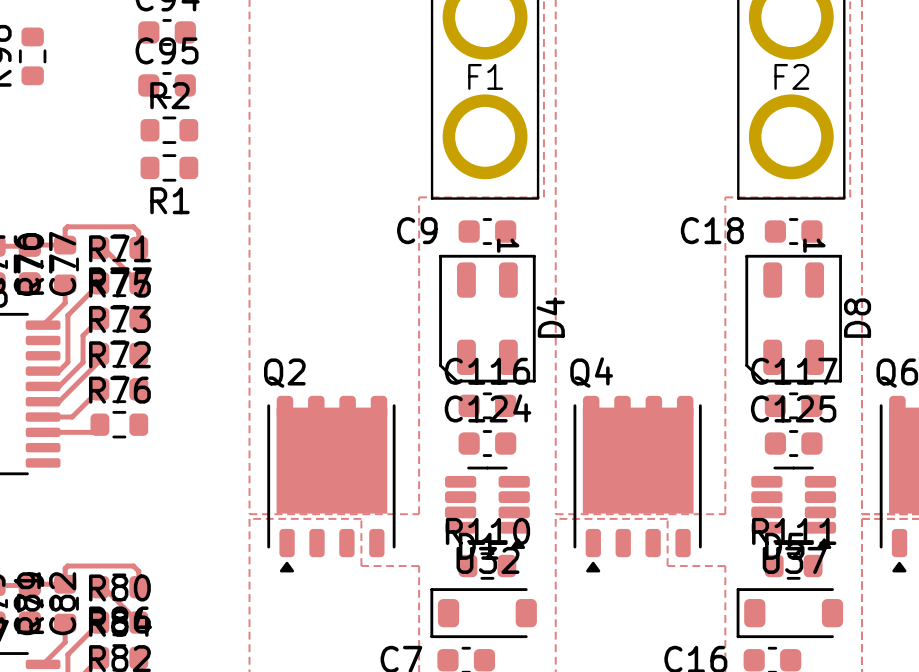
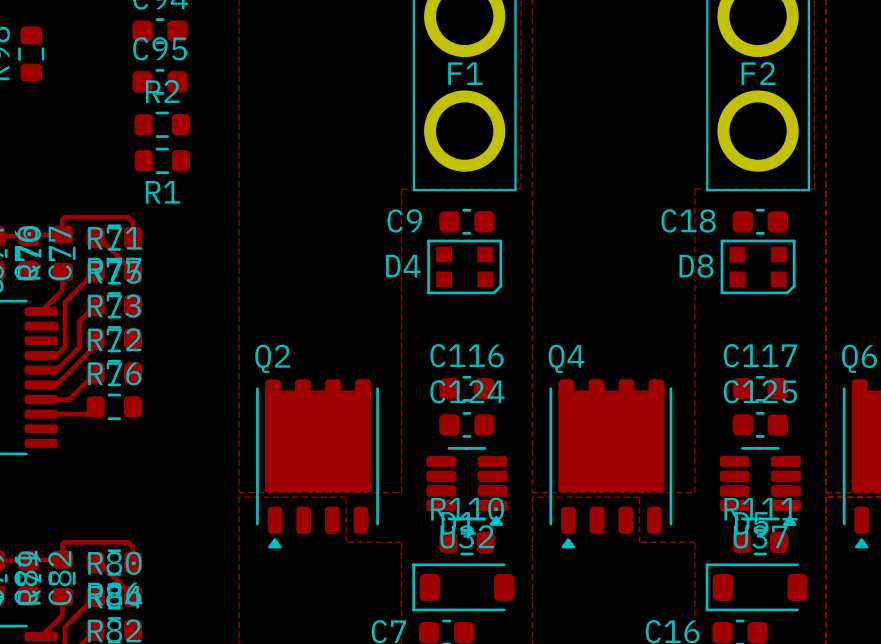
D4 footprint: [439, 254, 536, 383] -> [427, 239, 503, 295]
D8 footprint: [745, 254, 842, 383] -> [720, 239, 796, 295]
D4 name position: D4 (550, 317) -> D4 (403, 266)
D8 name position: D8 (857, 318) -> D8 (696, 266)

